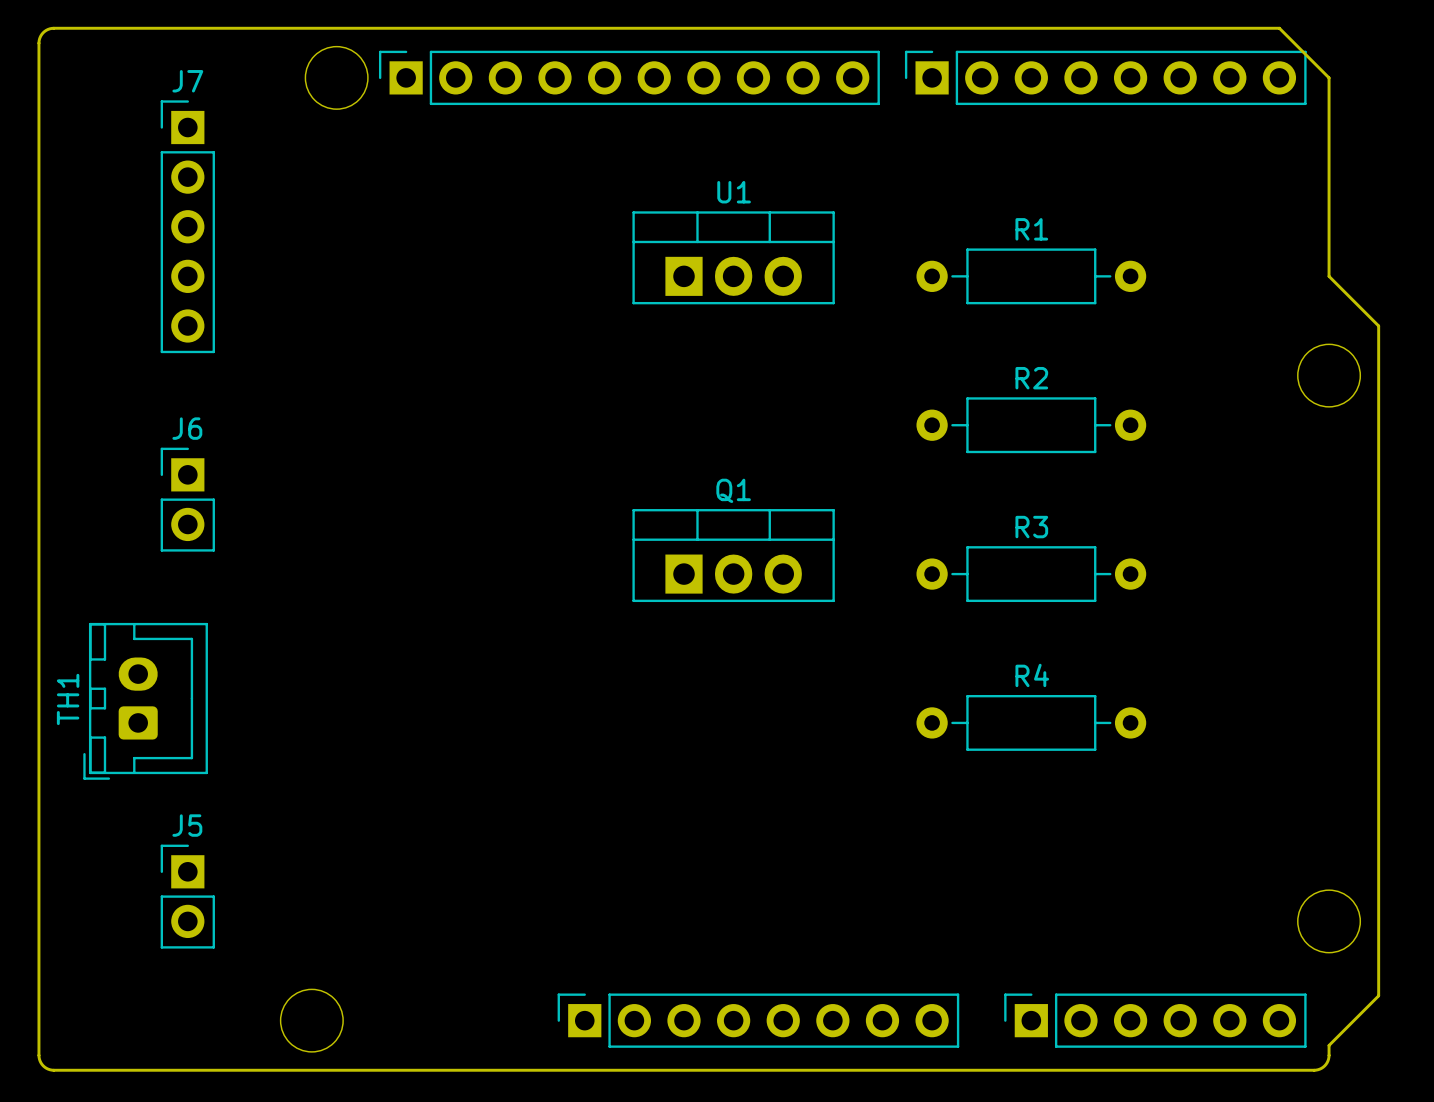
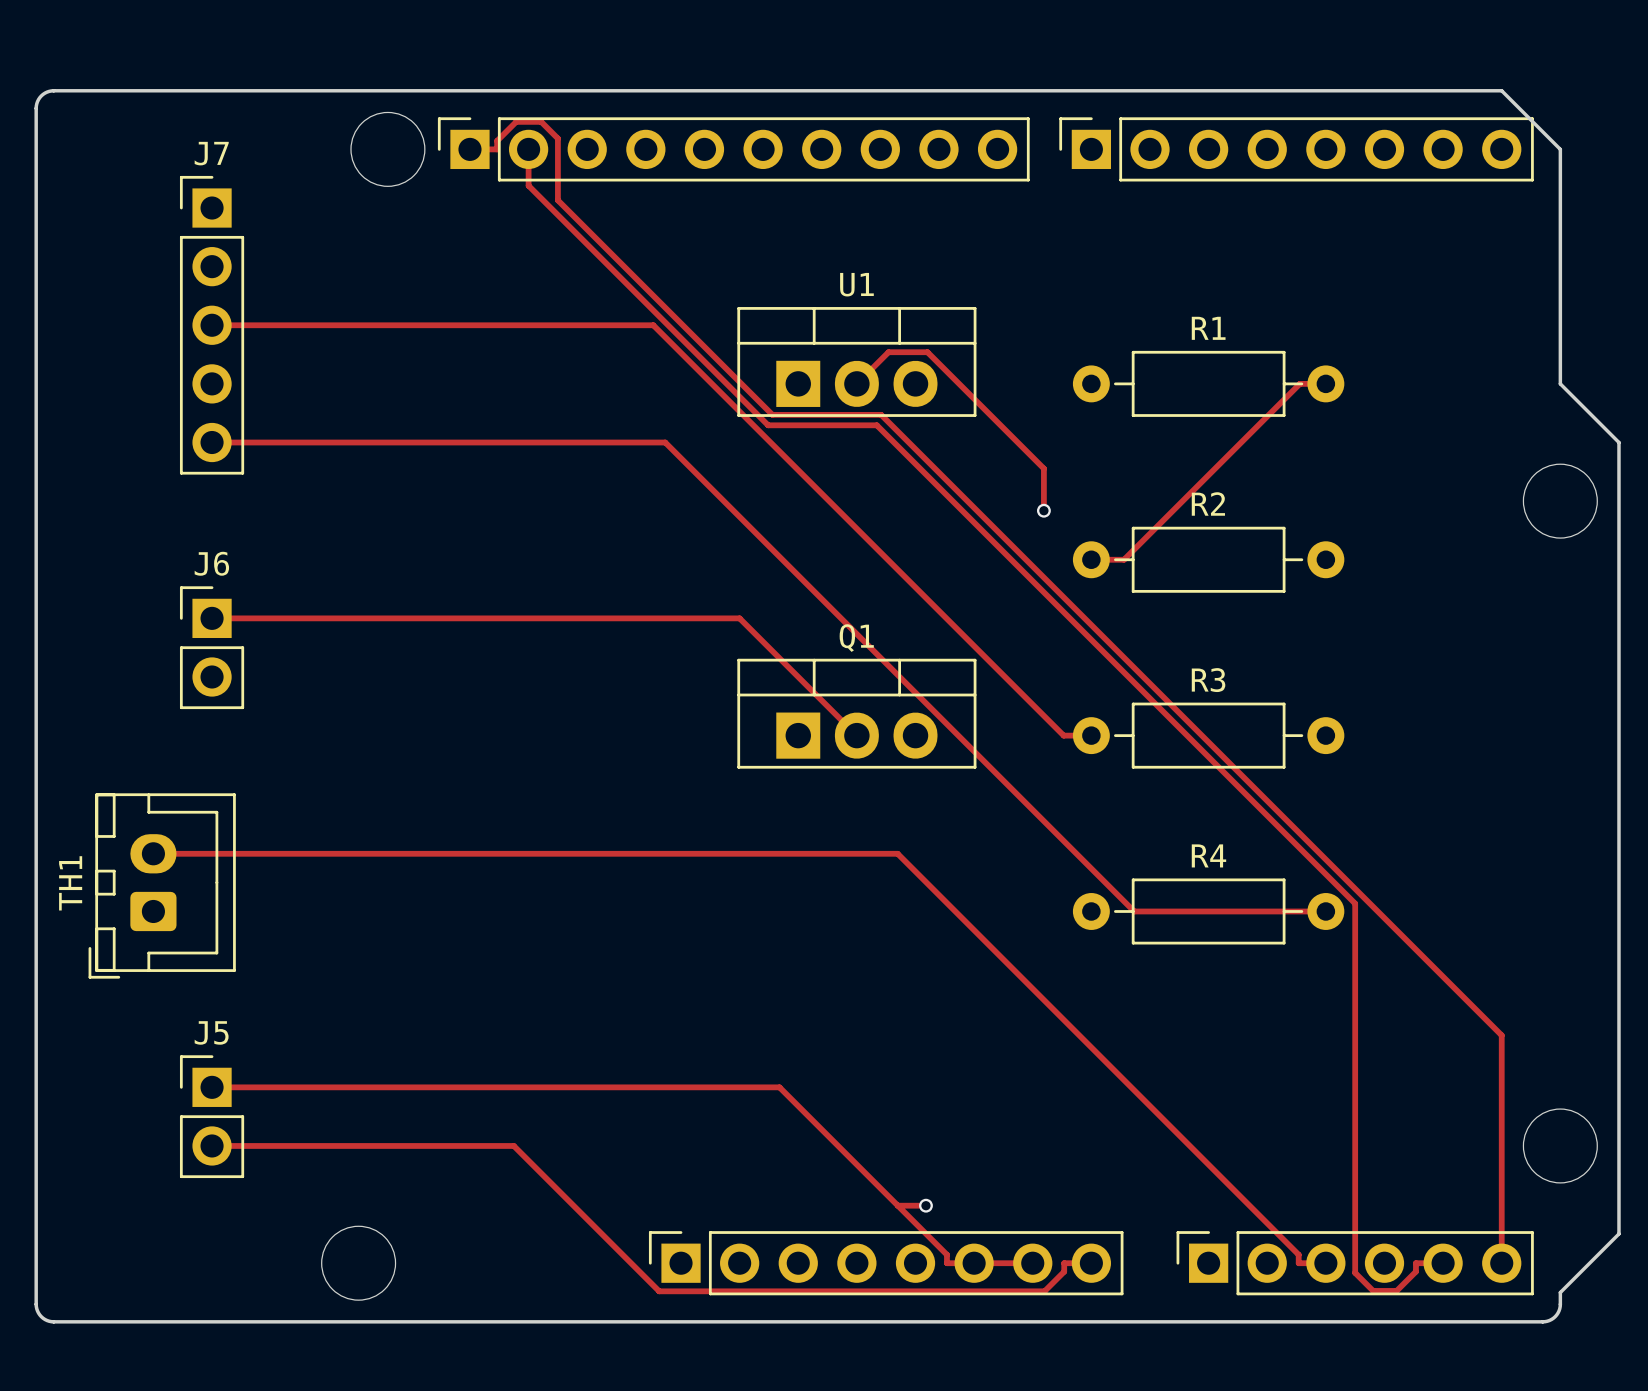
track: none -> (469, 149) (497, 149) (497, 140) (516, 121) (541, 121) (557, 138) (557, 200) (772, 414) (881, 414) (1501, 1035) (1501, 1263)
track: none -> (528, 149) (528, 185) (768, 425) (876, 425) (1355, 903) (1355, 1272) (1373, 1290) (1396, 1290) (1415, 1271) (1415, 1263) (1443, 1263)
track: none -> (212, 325) (653, 325) (1063, 735) (1091, 735)
track: none -> (856, 383) (888, 352) (927, 352) (1043, 468) (1043, 510)
track: none -> (1325, 383) (1299, 383) (1123, 559) (1091, 559)
track: none -> (212, 442) (665, 442) (1134, 911) (1325, 911)
via: none -> (1043, 510)
track: none -> (212, 618) (739, 618) (856, 735)
track: none -> (153, 853) (897, 853) (1298, 1254) (1298, 1263) (1325, 1263)
track: none -> (212, 1087) (779, 1087) (946, 1254) (946, 1263) (1032, 1263)
track: none -> (212, 1145) (513, 1145) (659, 1291) (1044, 1291) (1064, 1271) (1064, 1263) (1091, 1263)
track: none -> (897, 1205) (925, 1205)
via: none -> (925, 1205)

